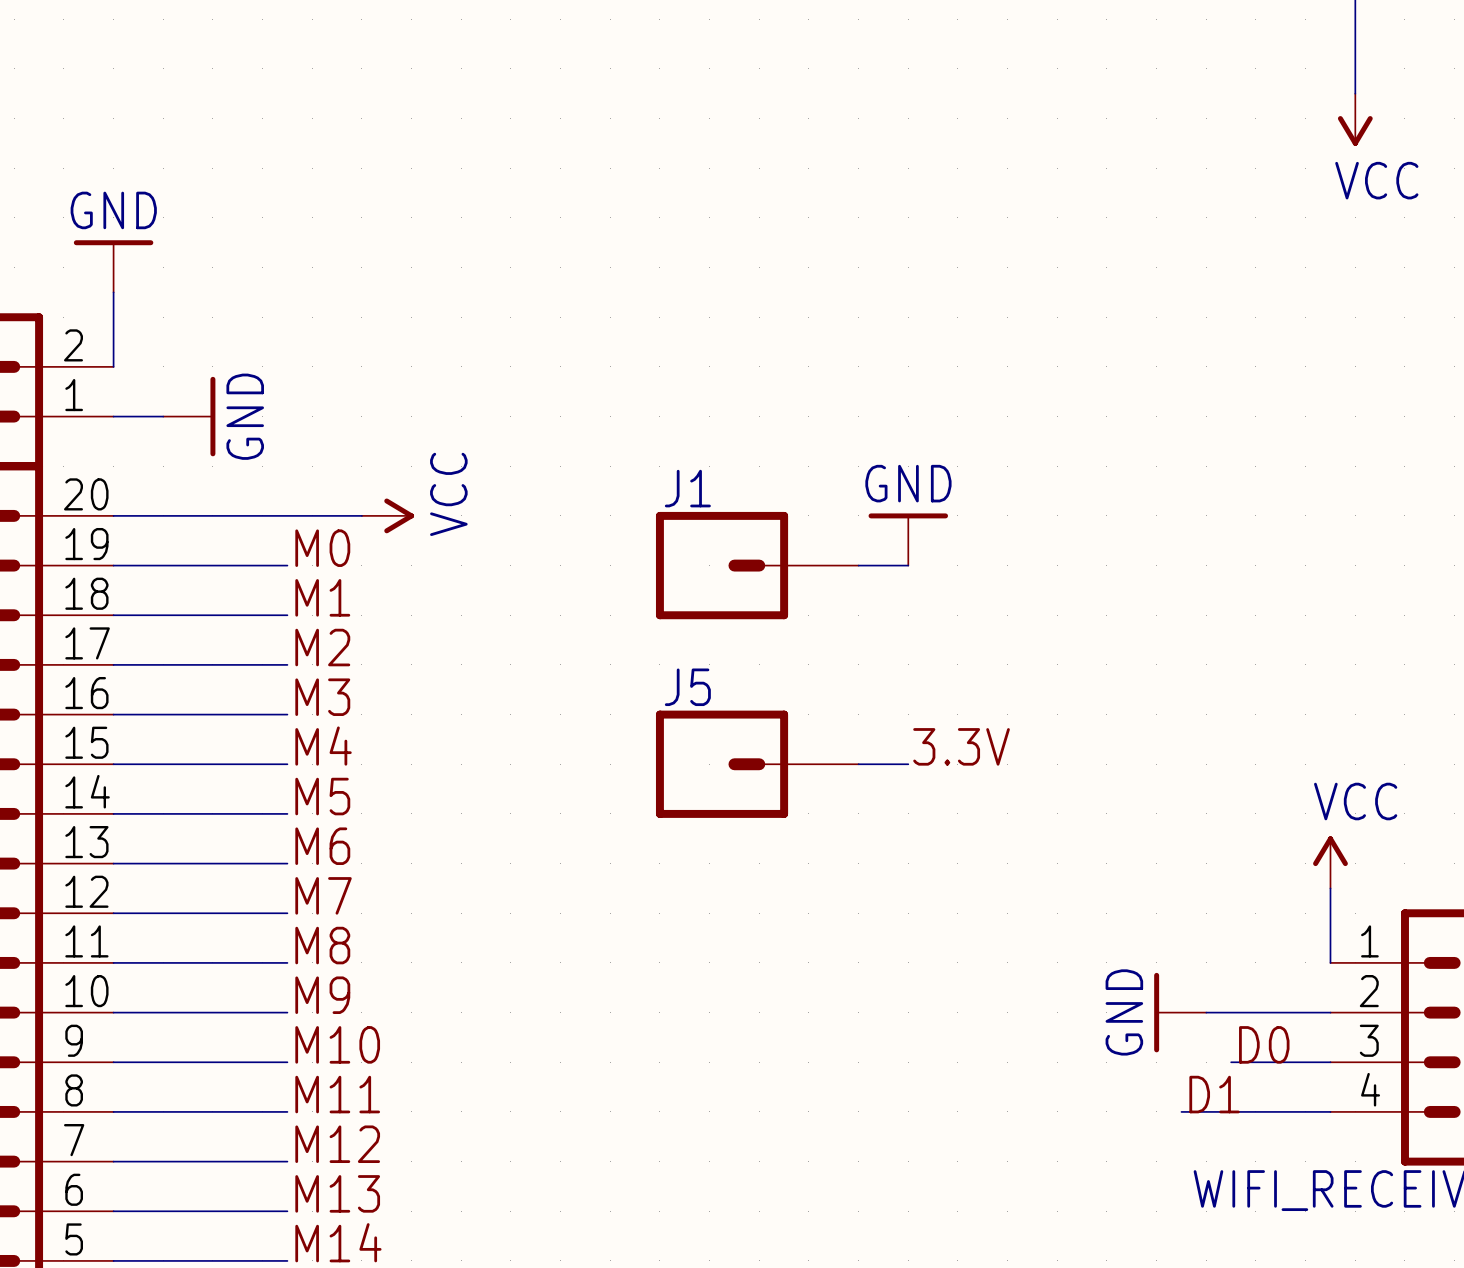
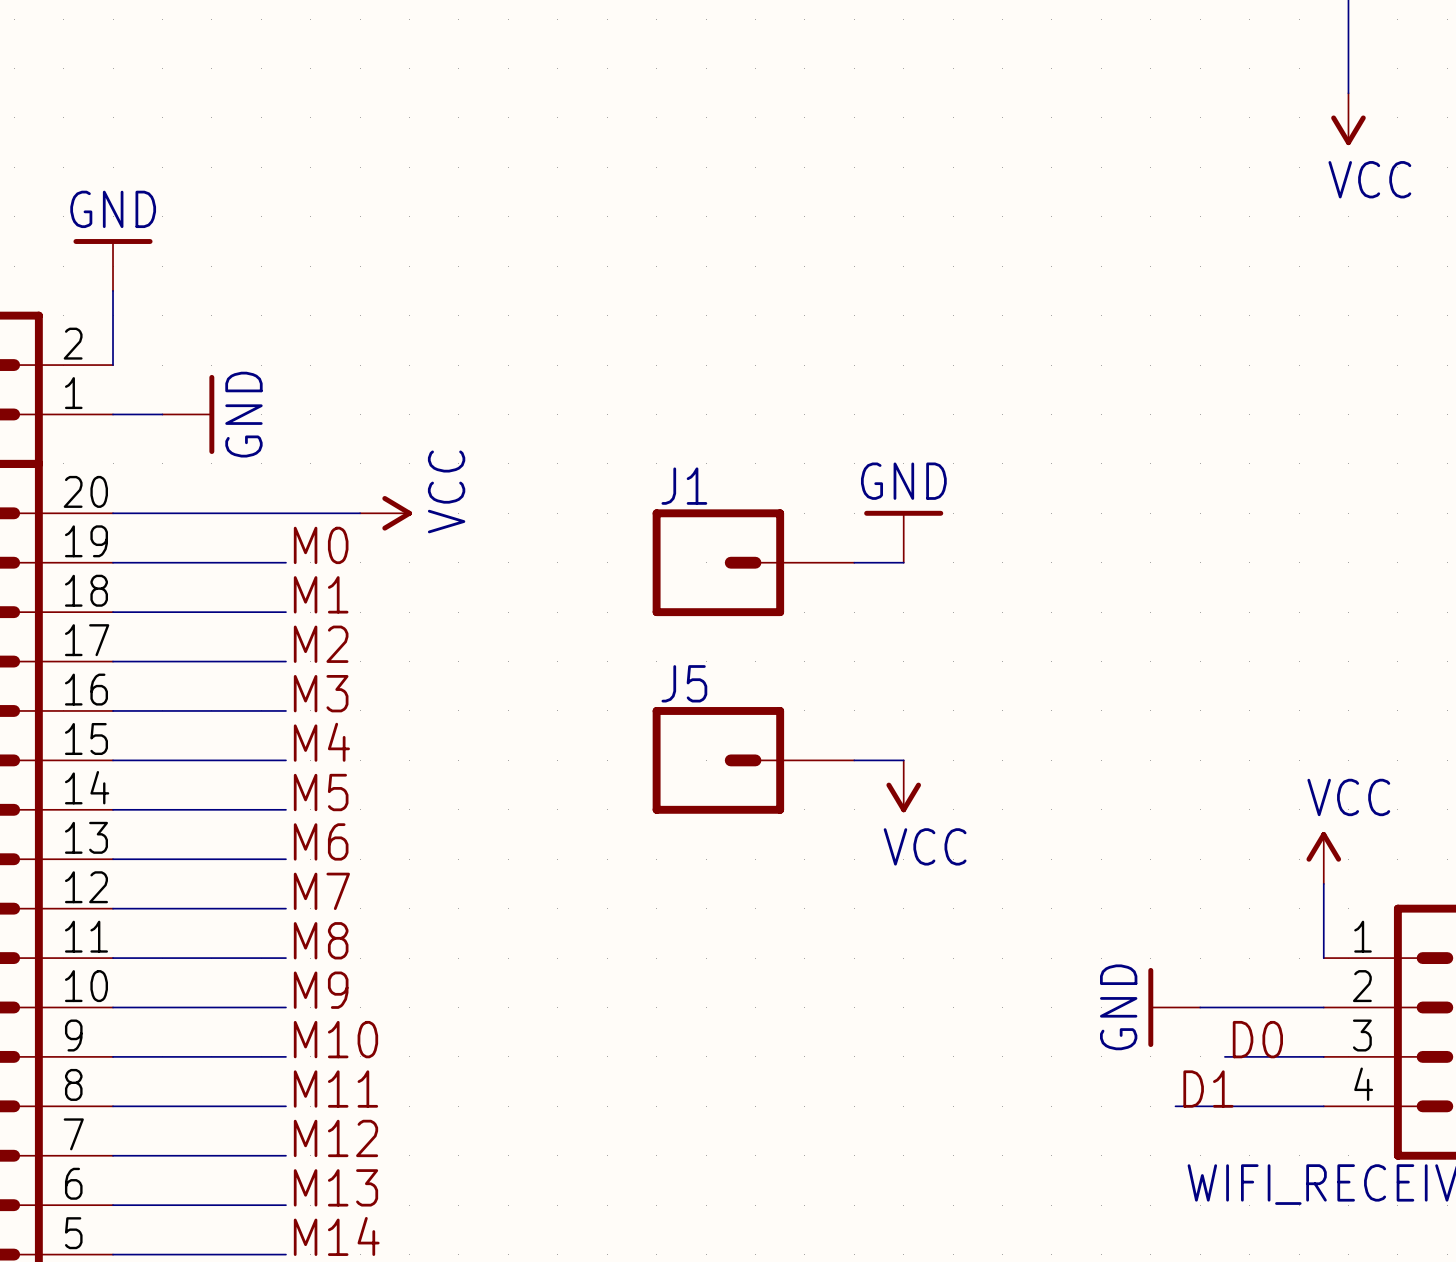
label: 3.3V (961, 746) -> none
power symbol: none -> VCC (903, 786)

